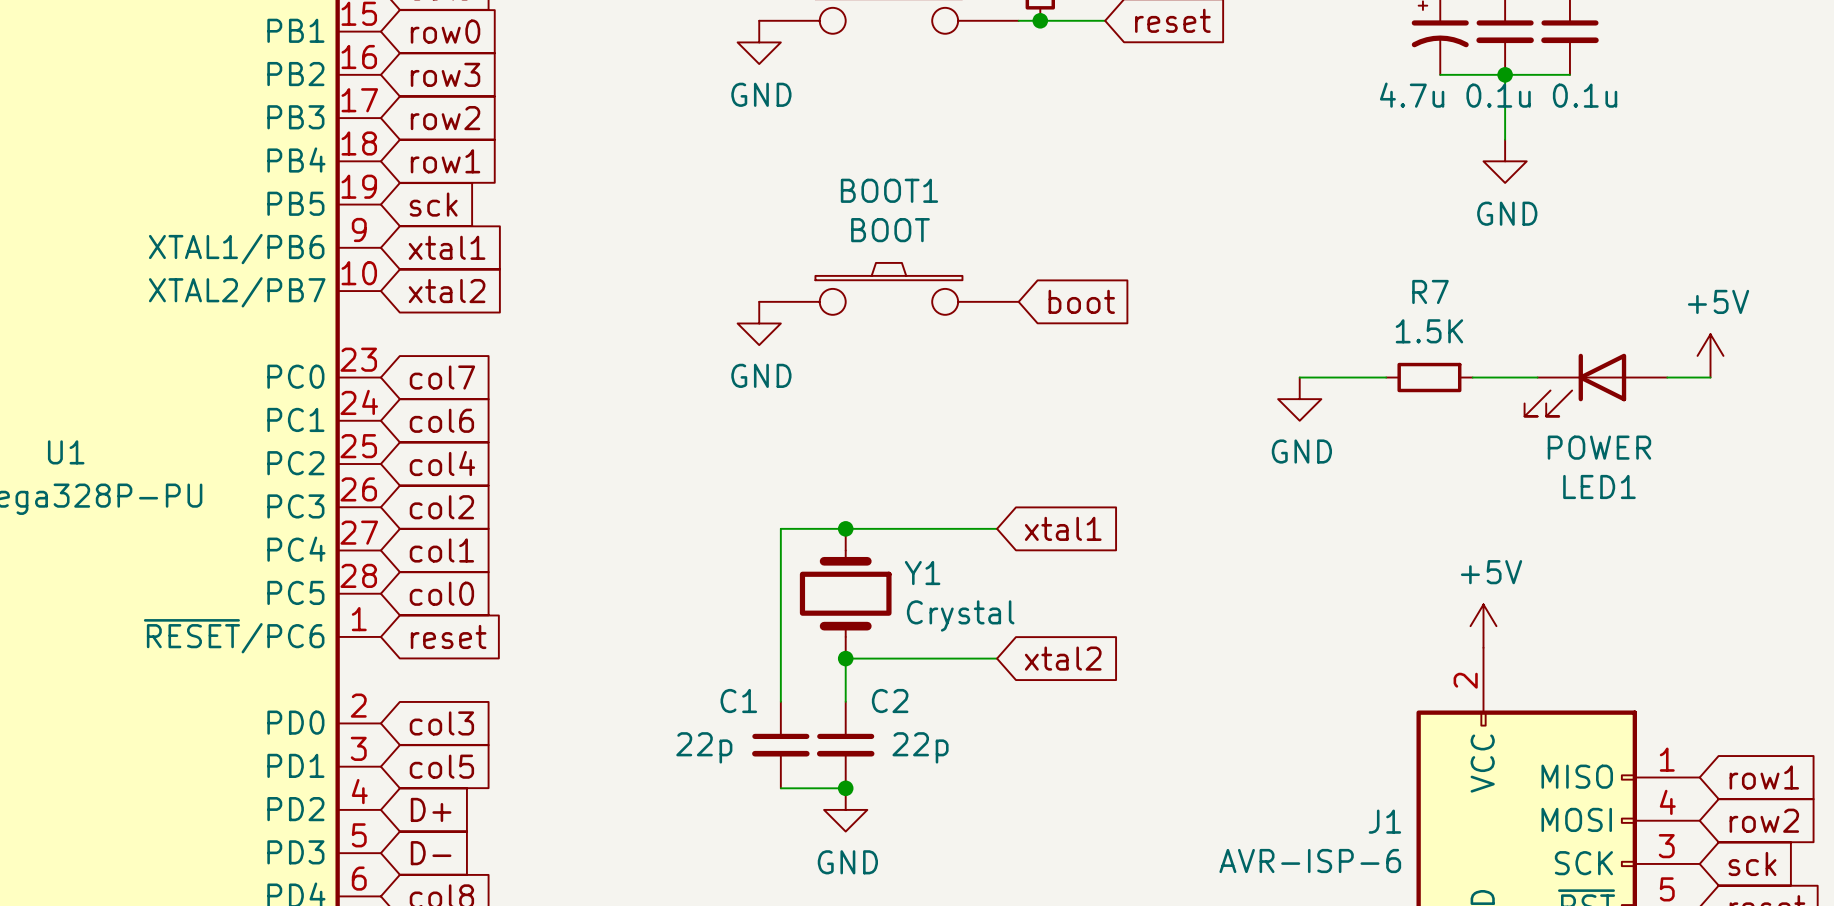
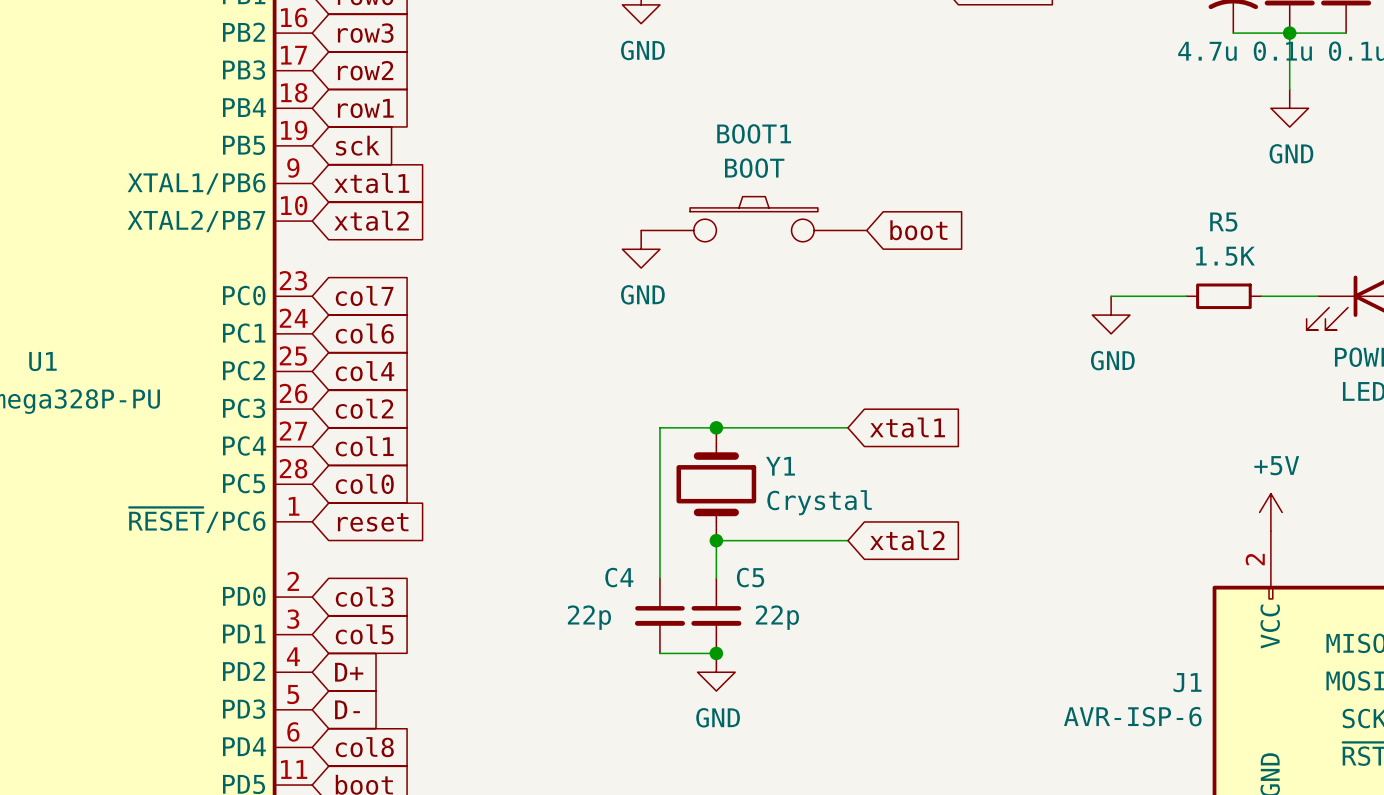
R7 name: R7 (1430, 291) -> R5 (1223, 222)
C1 name: C1 (738, 701) -> C4 (619, 577)
C2 name: C2 (890, 701) -> C5 (750, 577)

